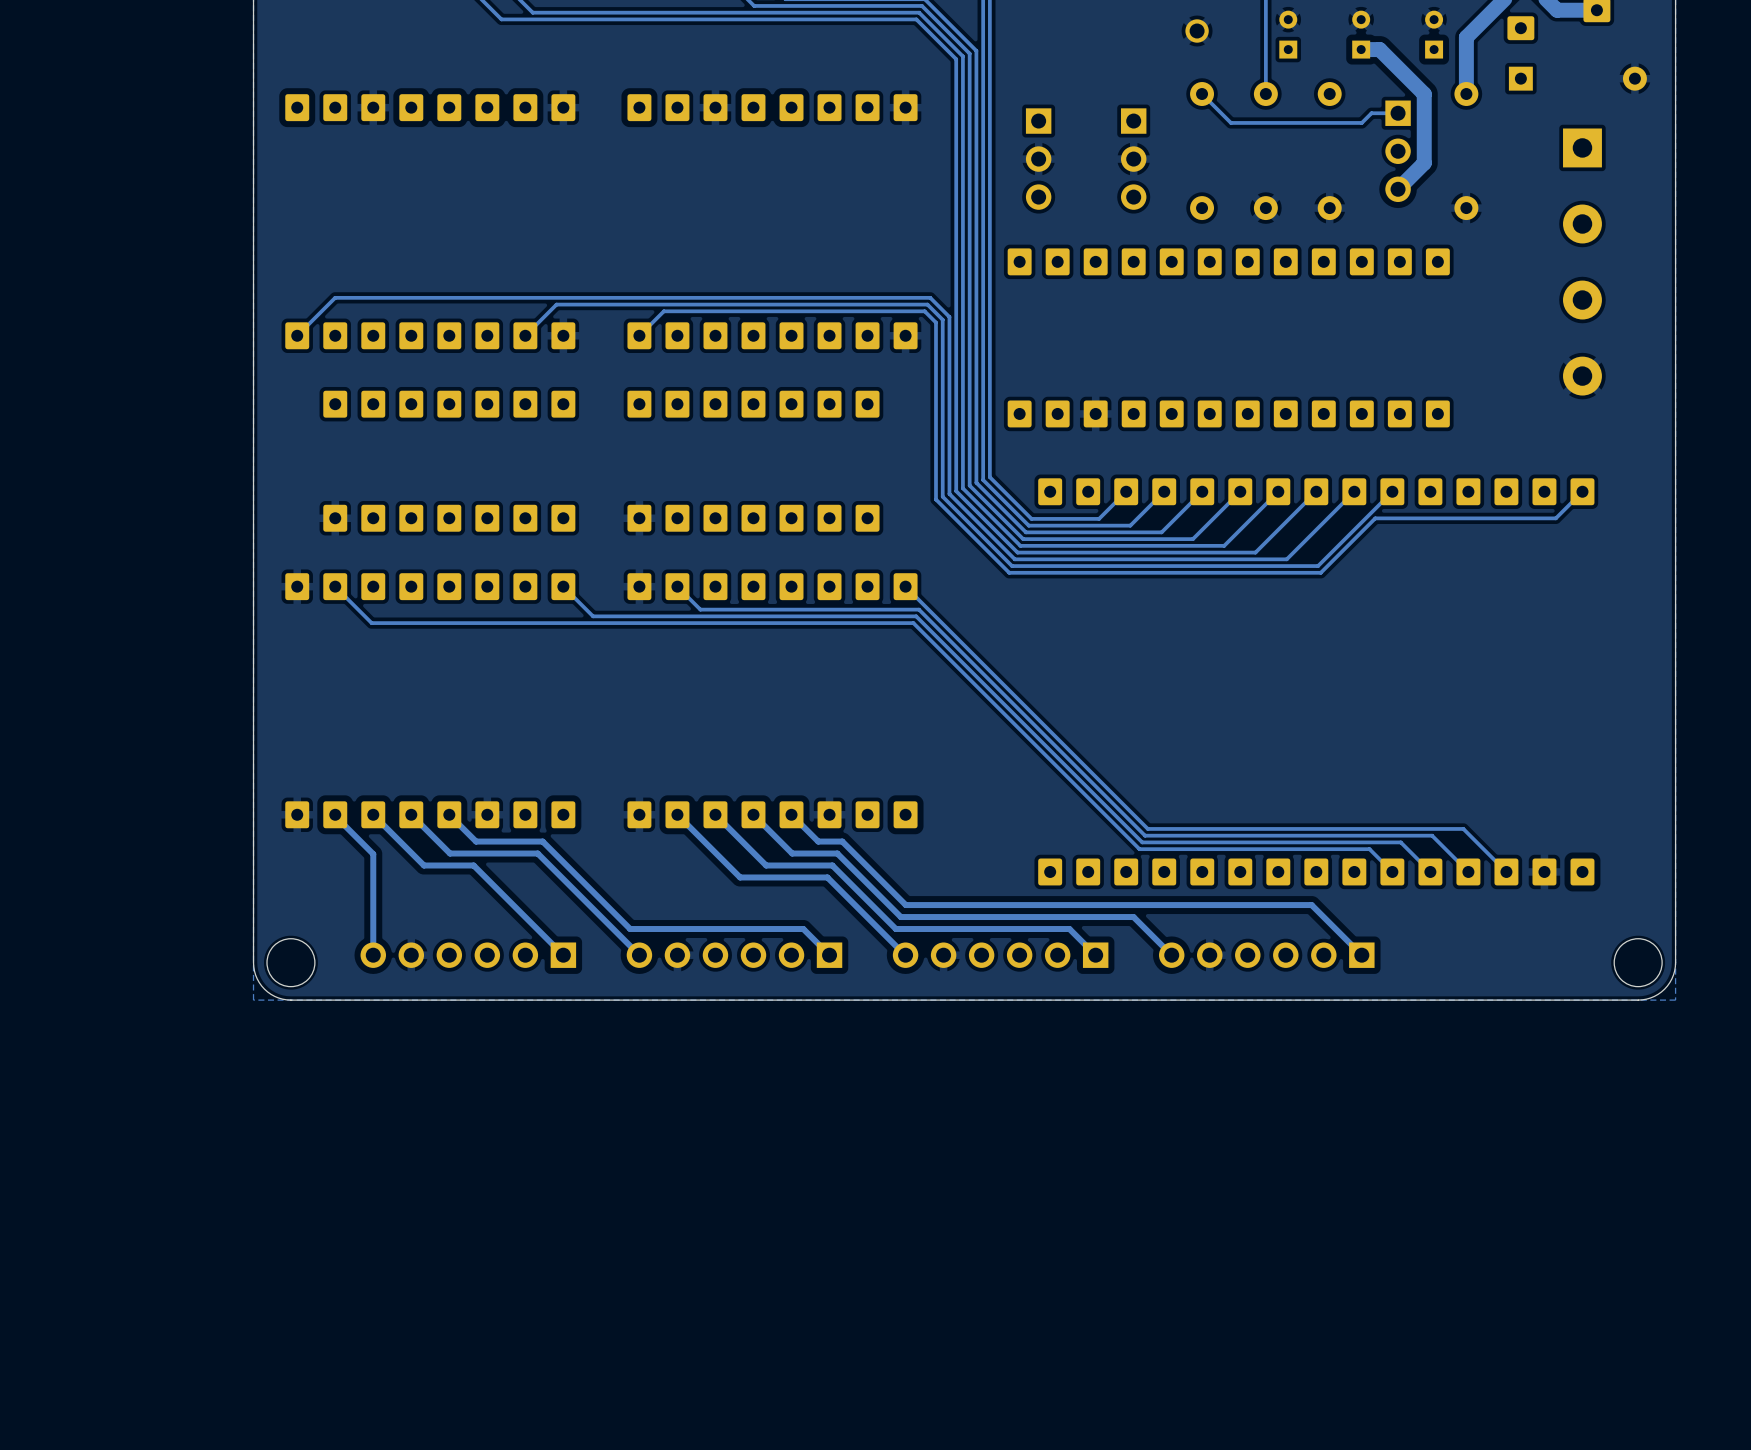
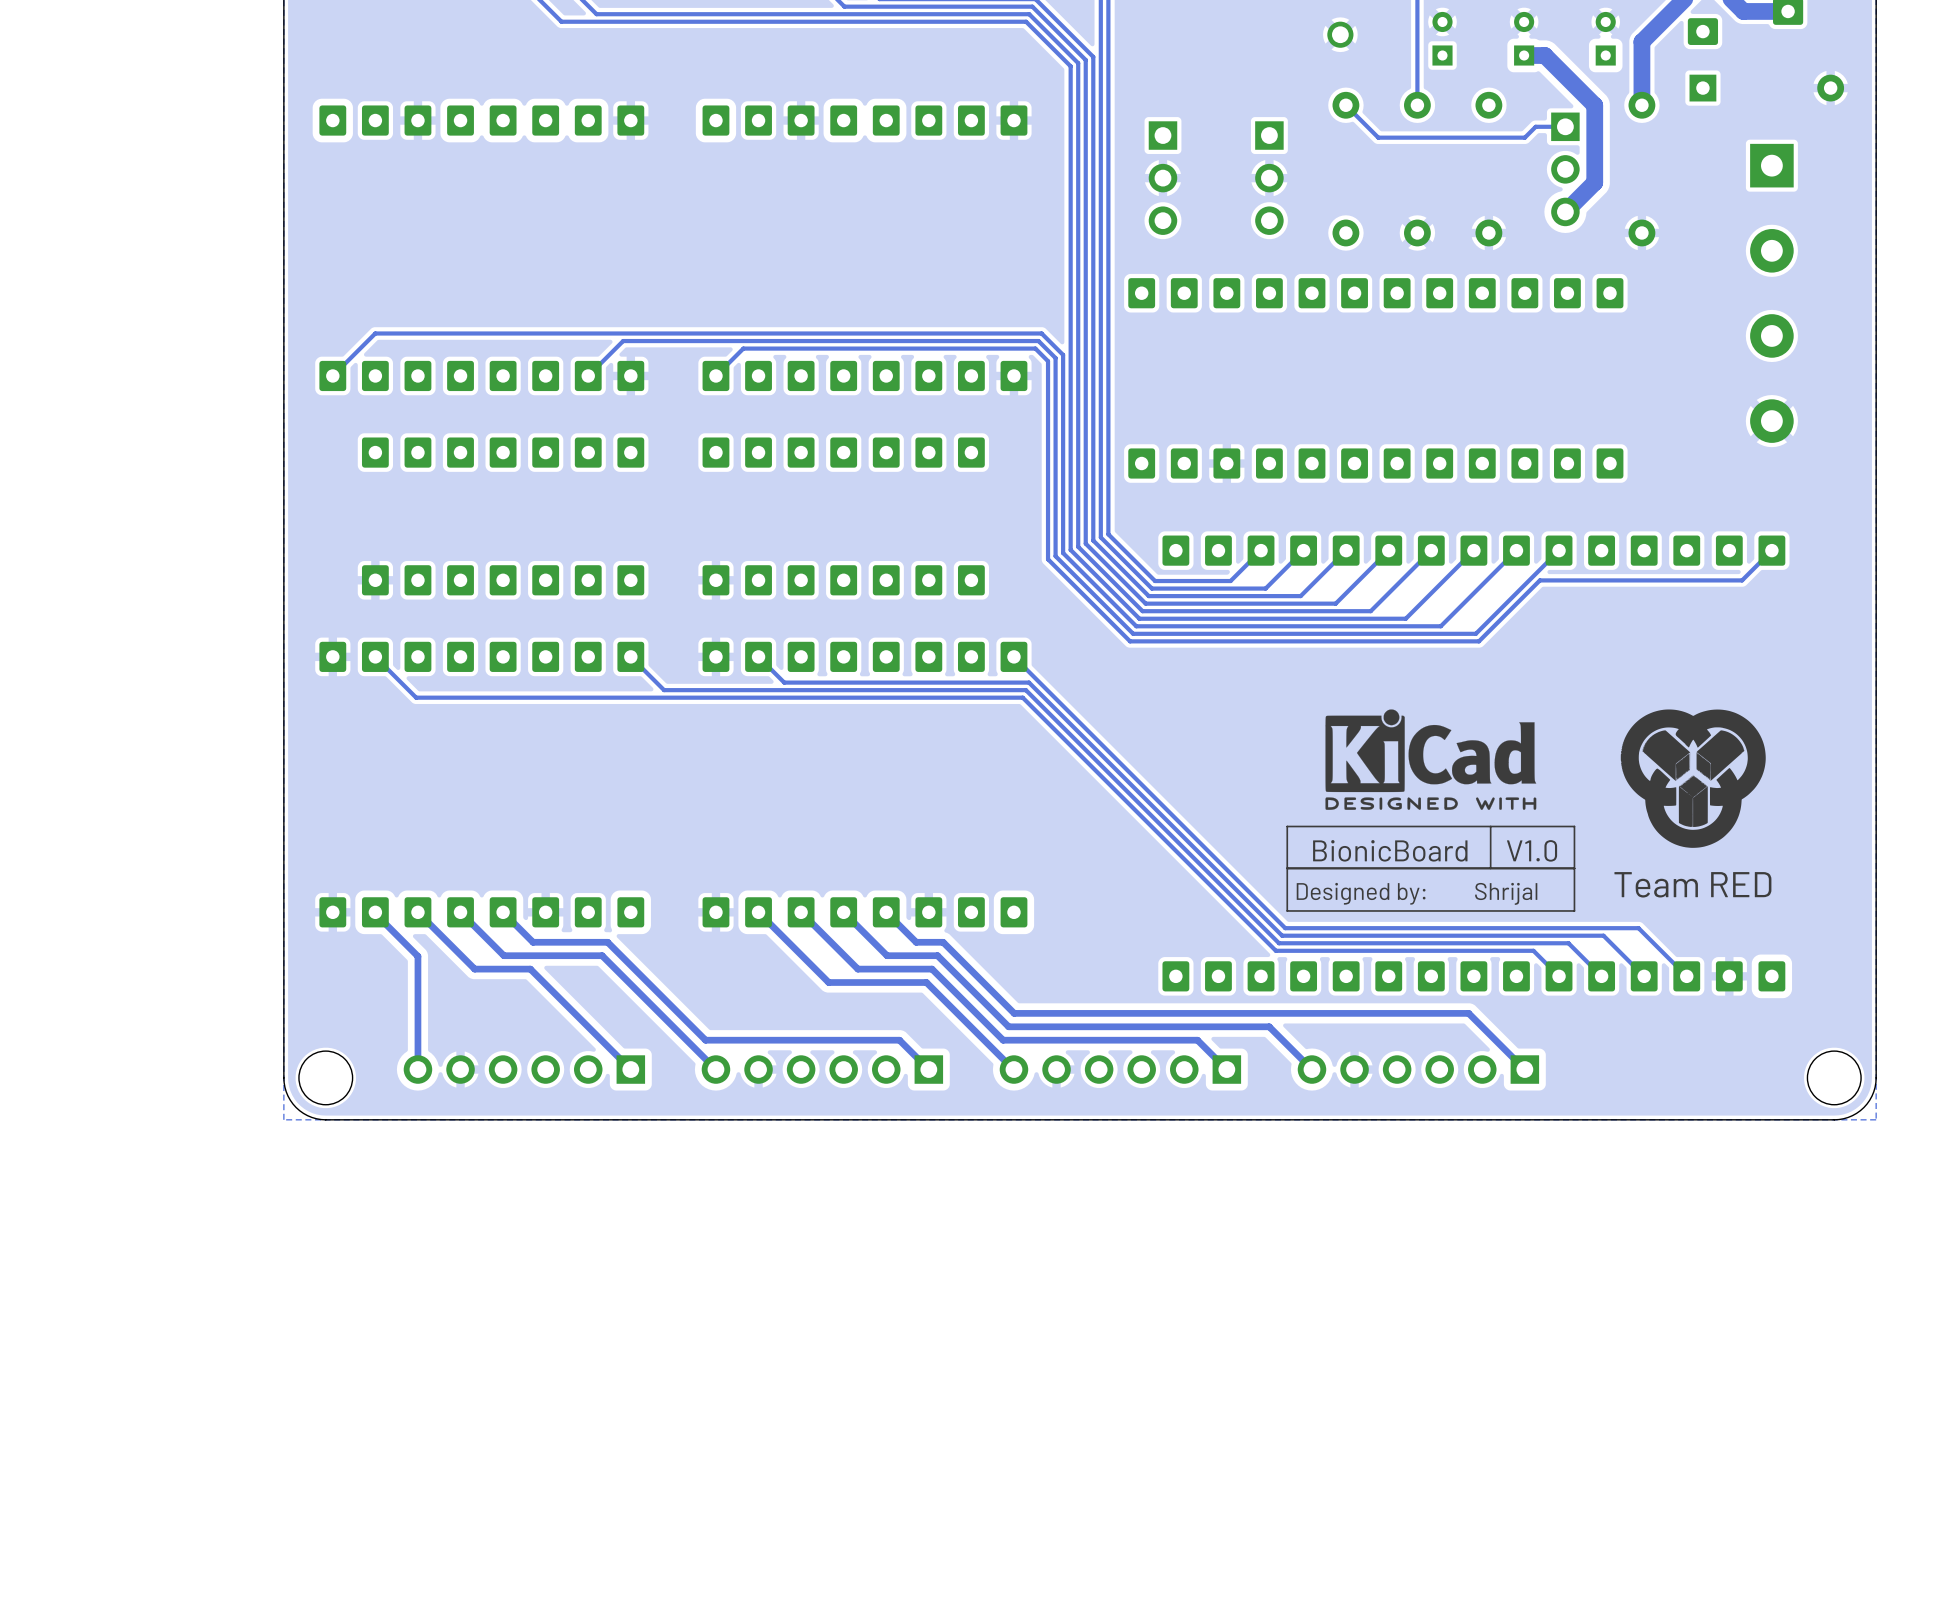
drawing: none -> [1325, 709, 1537, 810]
drawing: none -> [1620, 709, 1766, 848]
line: none -> (1490, 826) (1490, 868)
line: none -> (1574, 826) (1574, 910) (1287, 910) (1287, 826) (1574, 826)
text: none -> BionicBoard (1390, 850)
text: none -> V1.0 (1532, 850)
text: none -> Team RED (1692, 884)
text: none -> Designed by: (1361, 893)
text: none -> Shrijal (1506, 893)

